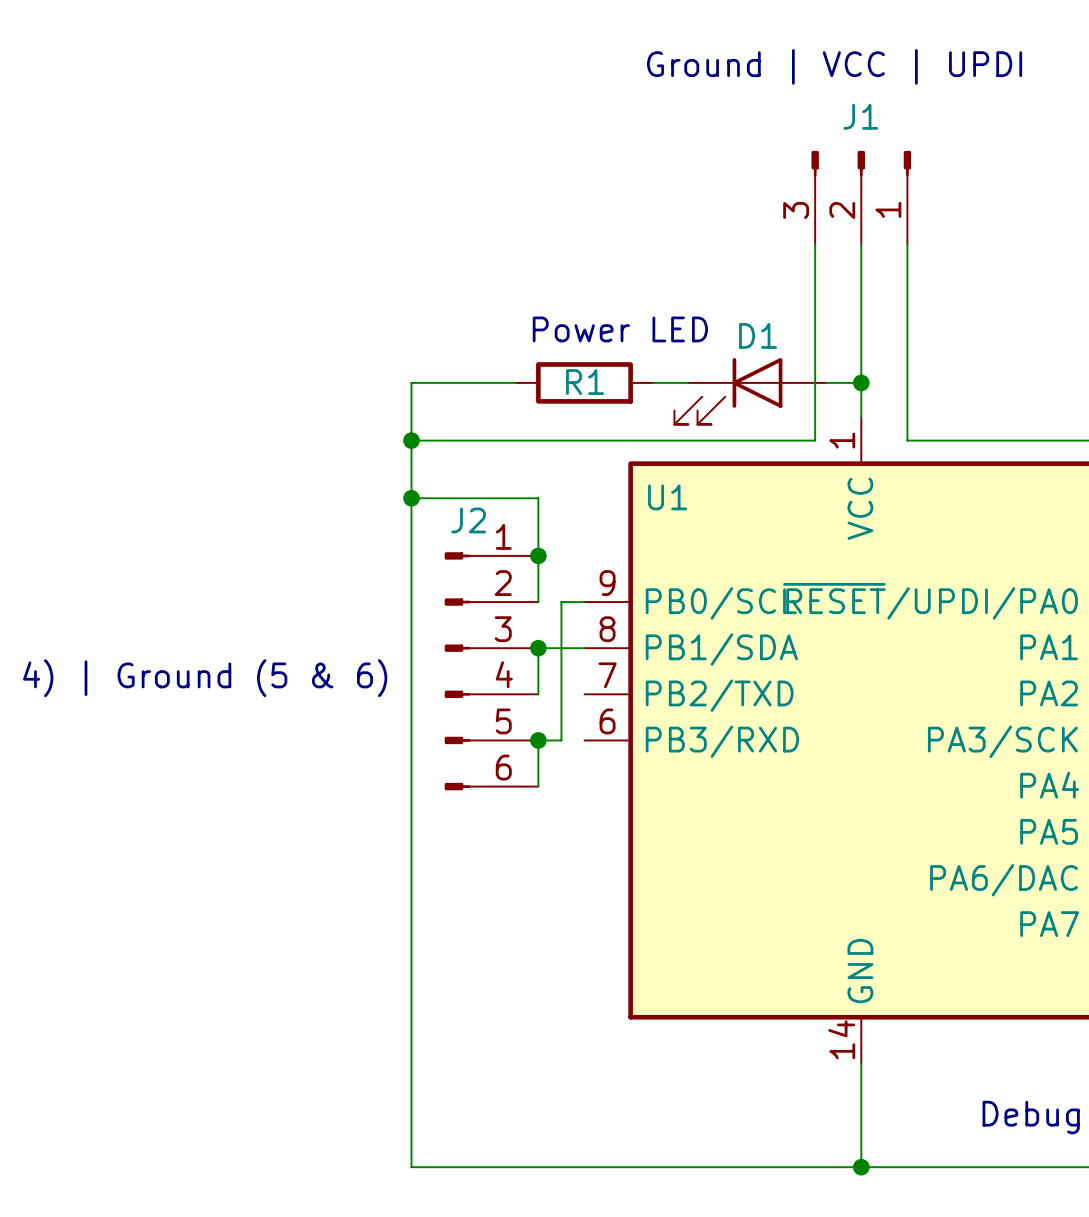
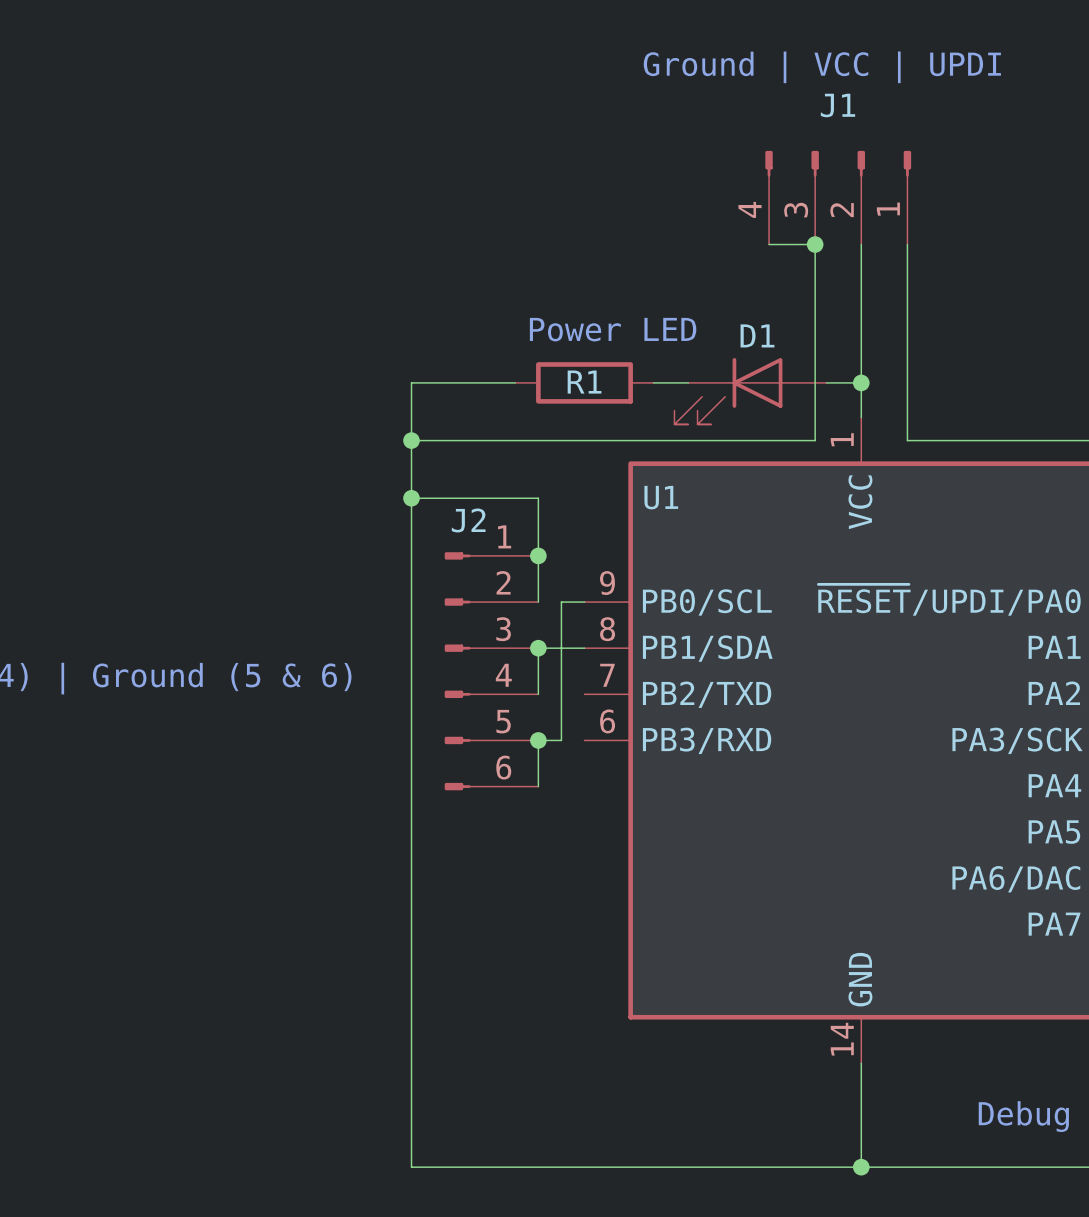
J1 symbol: [811, 150, 912, 245] -> [765, 150, 912, 245]
wire: none -> (769, 244) (815, 244)
junction: none -> (815, 244)

